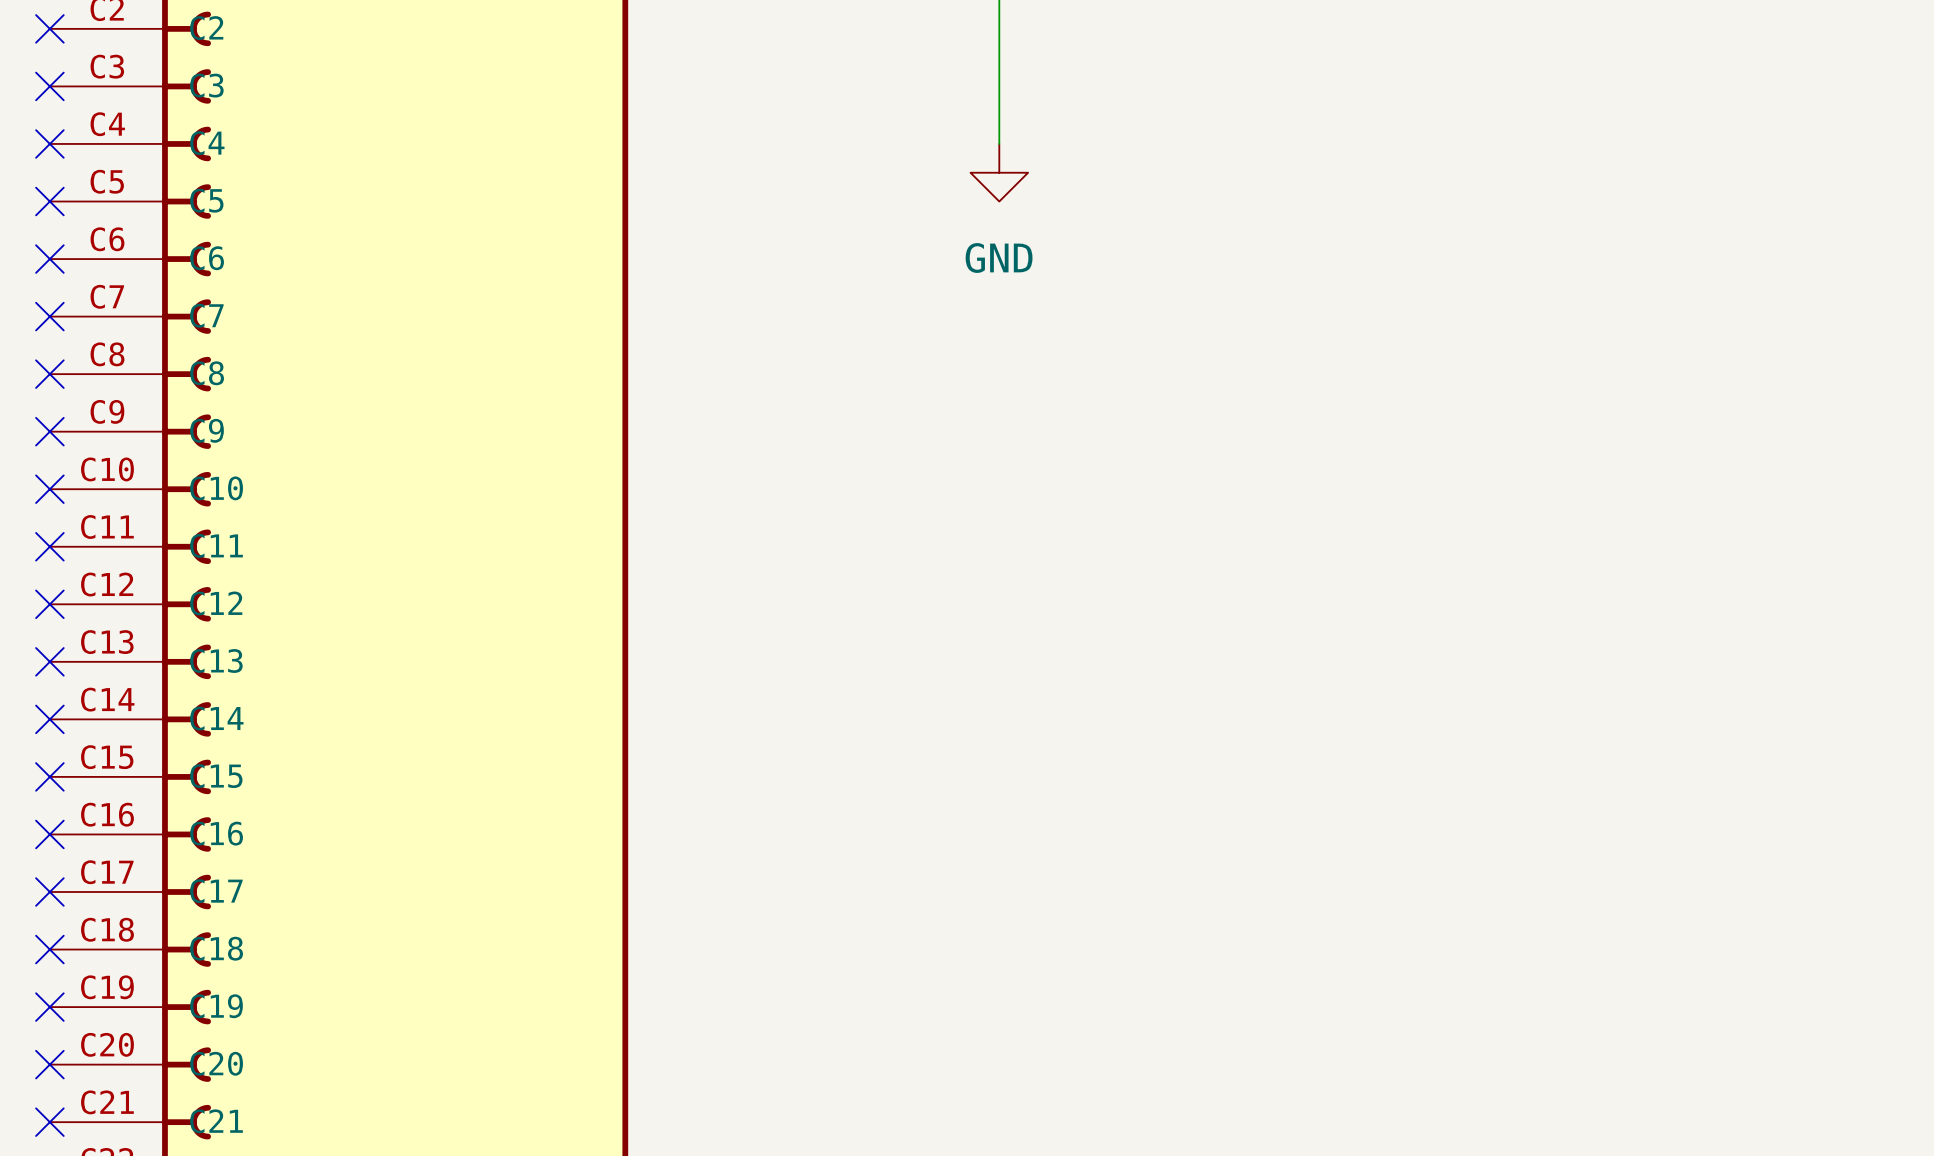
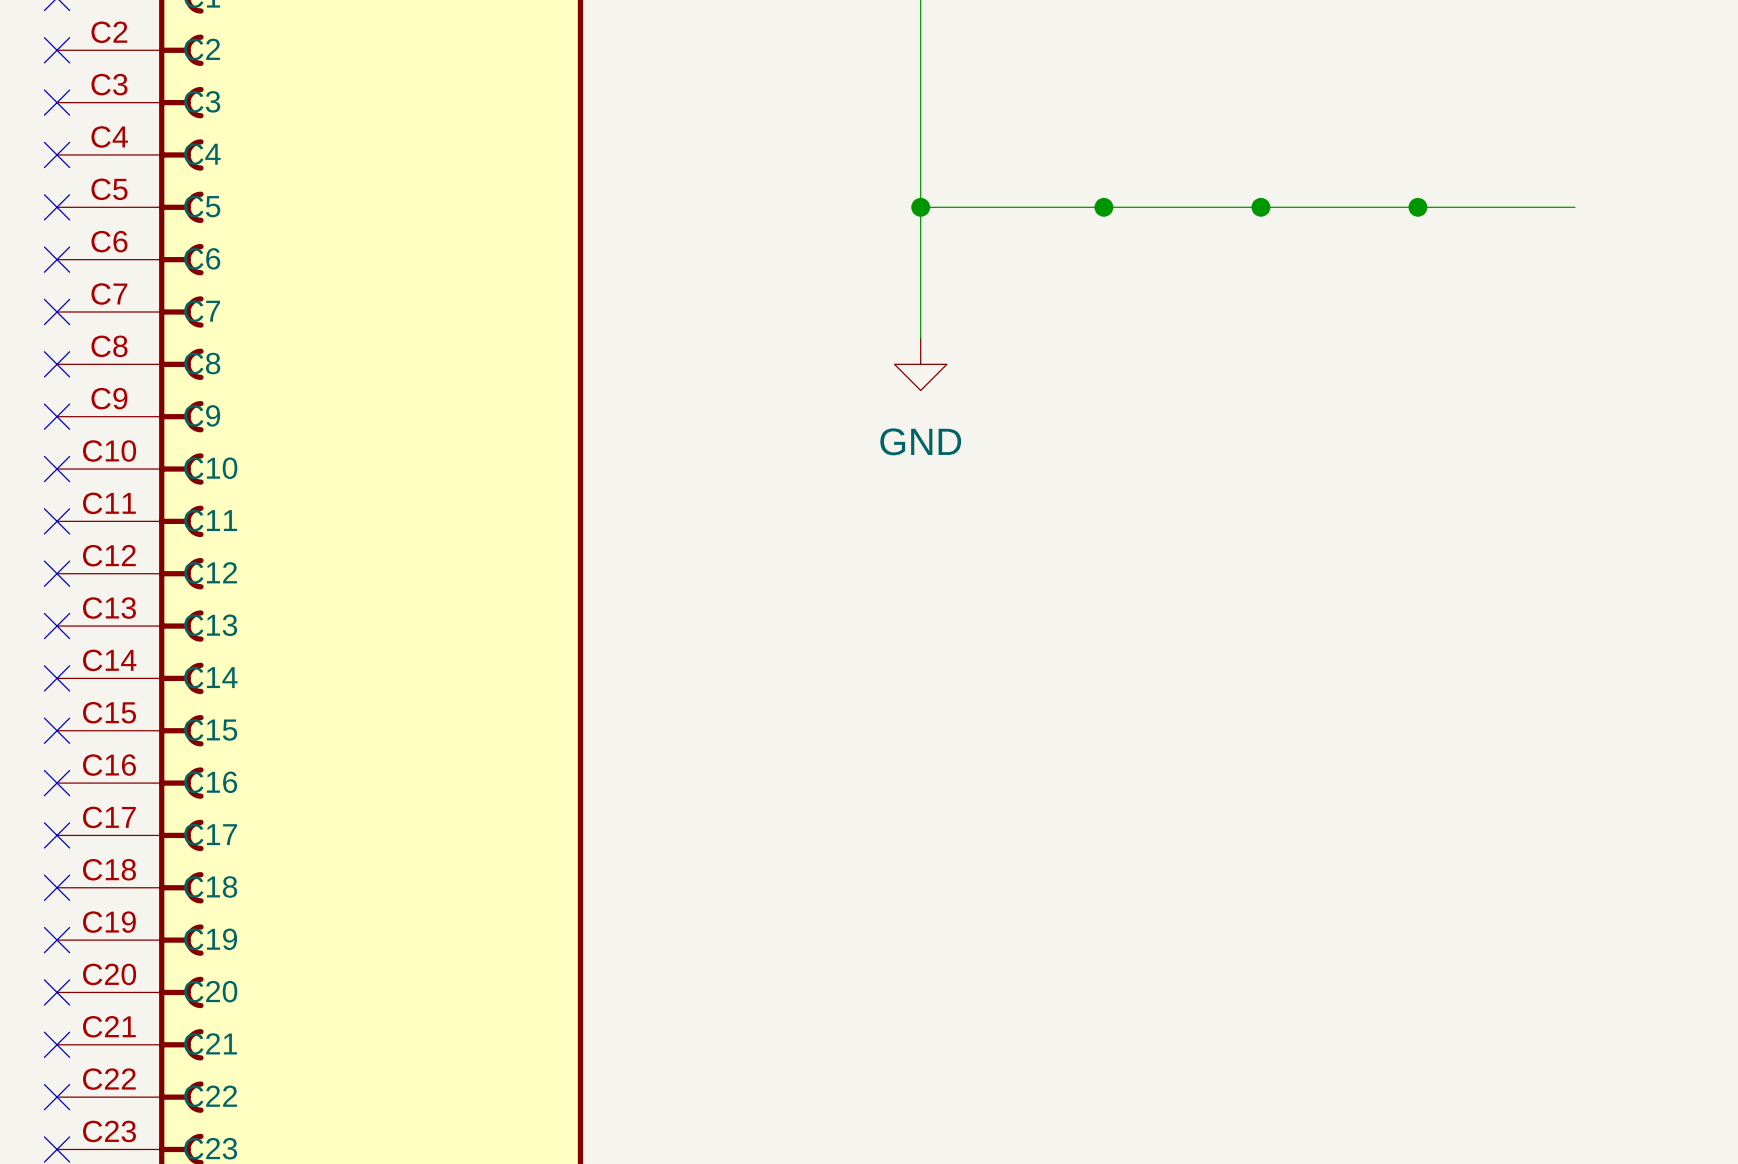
wire: none -> (920, 154) (920, 338)
power symbol position: GND (999, 172) -> GND (920, 364)
wire: none -> (920, 207) (1574, 207)
junction: none -> (920, 207)
junction: none -> (1103, 207)
junction: none -> (1260, 207)
junction: none -> (1417, 207)

